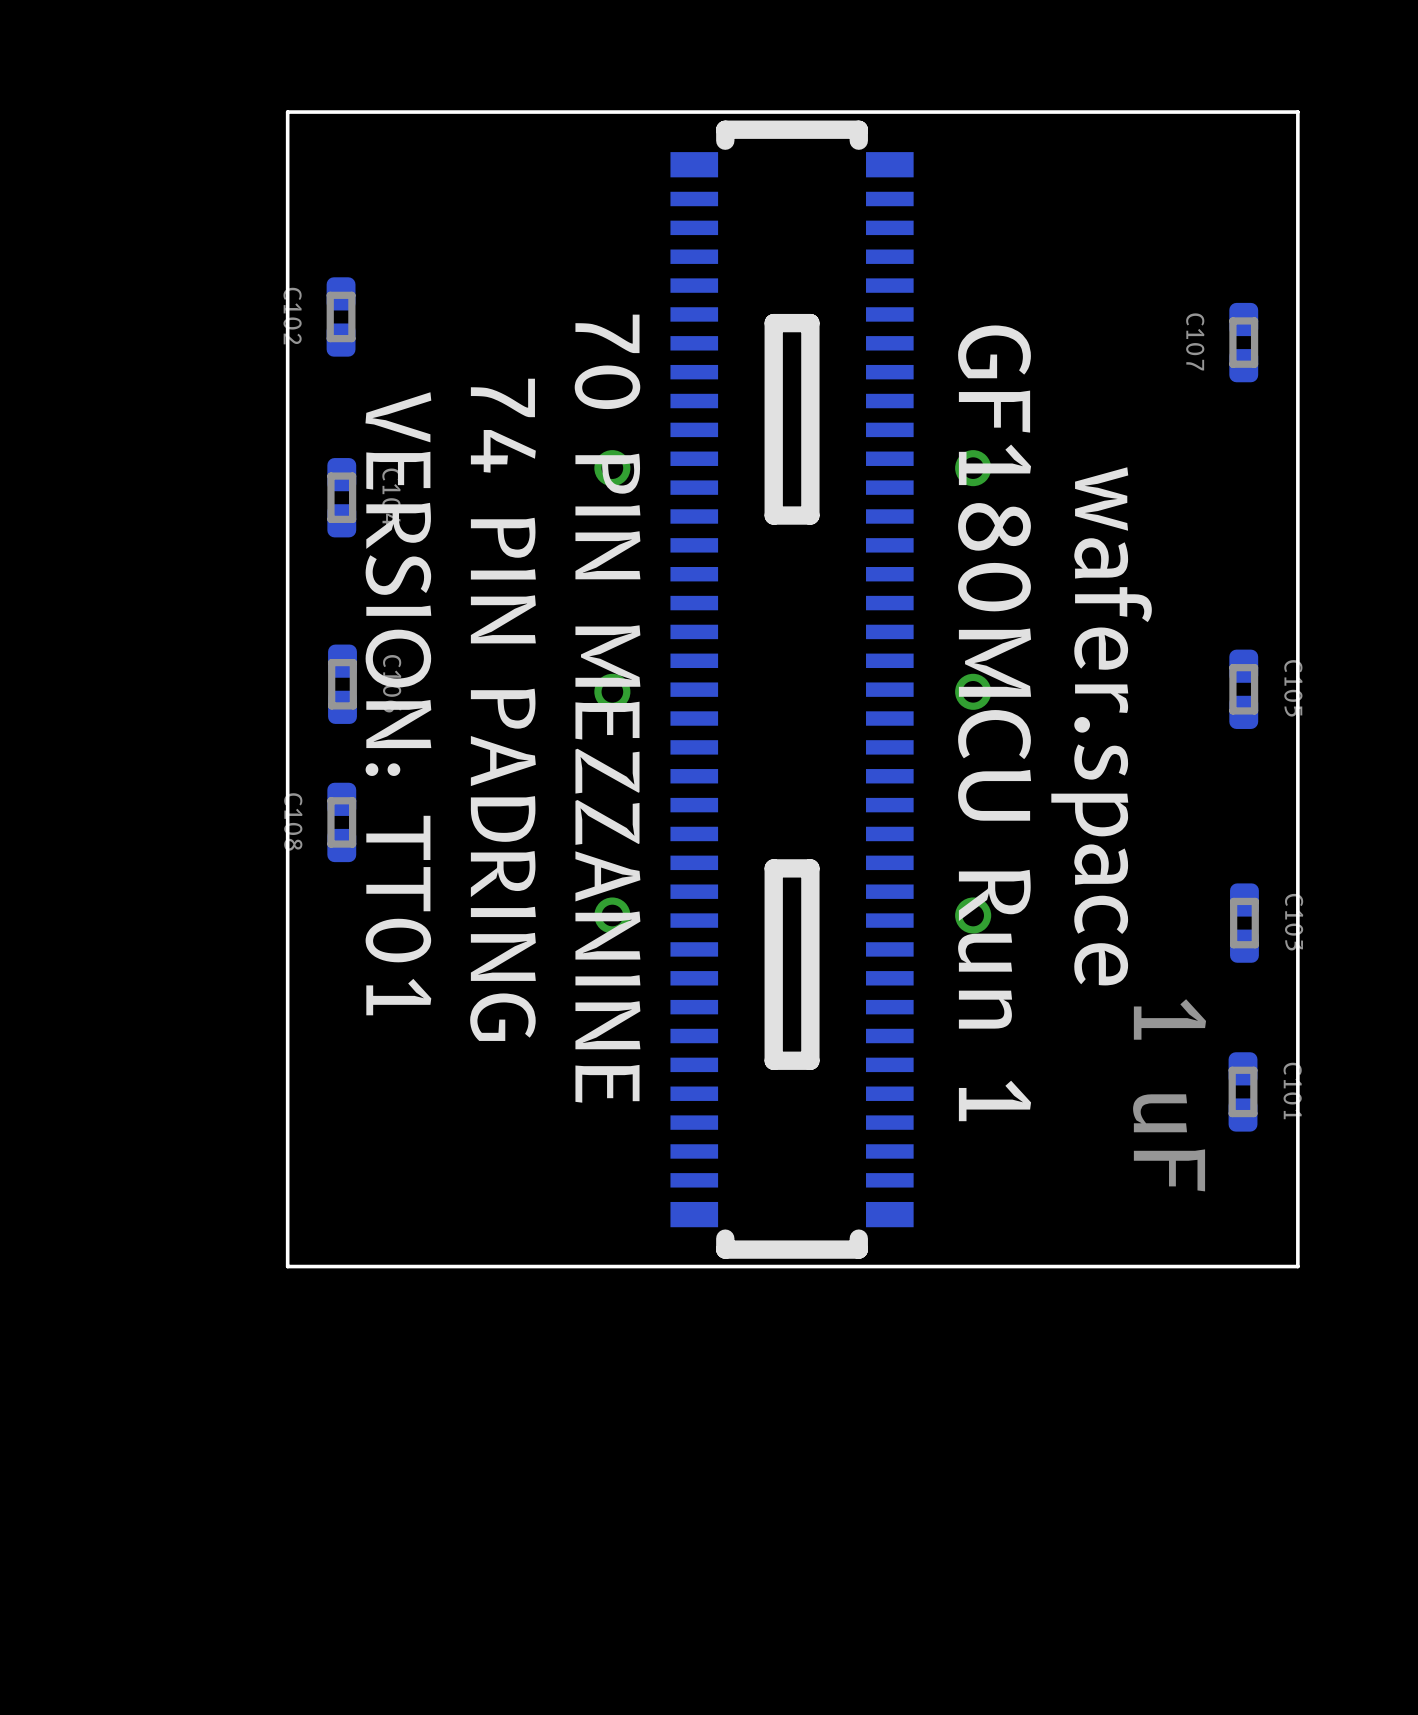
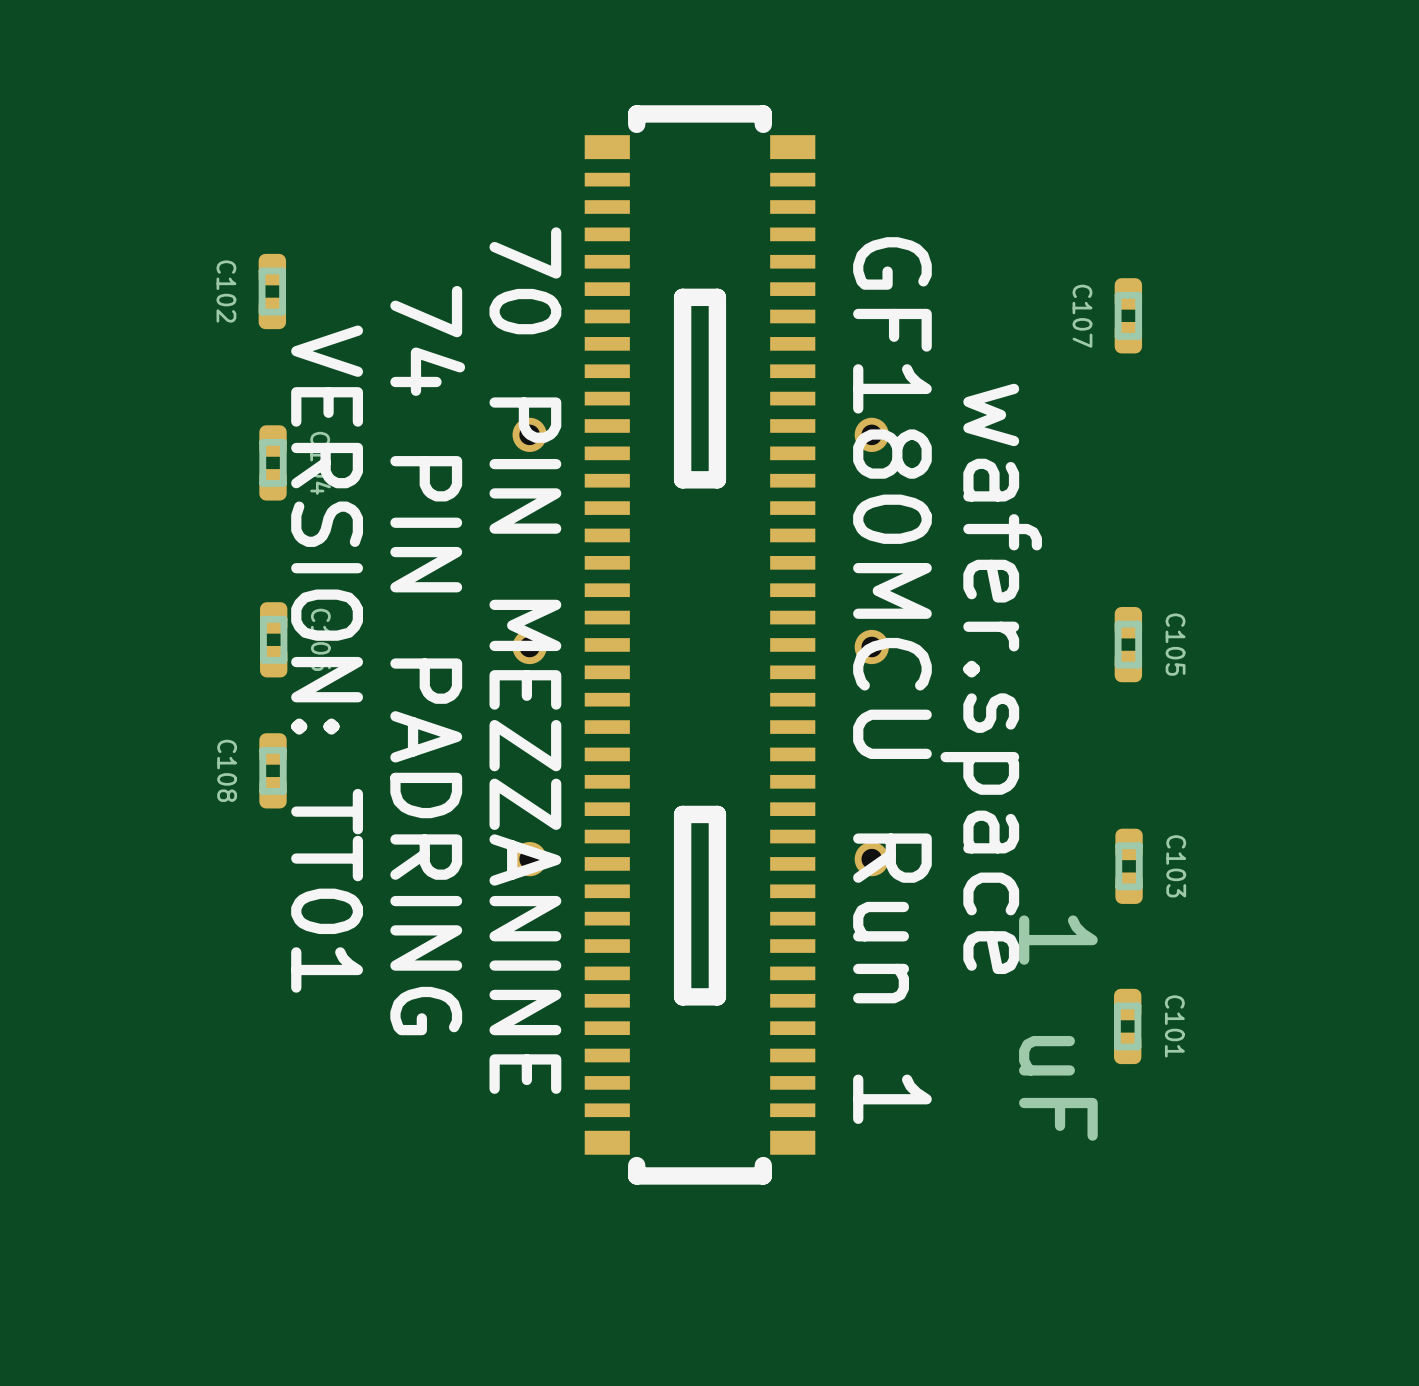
board edge: (1297, 112) (287, 112) (287, 1266) (1297, 1266) (1297, 112) -> none

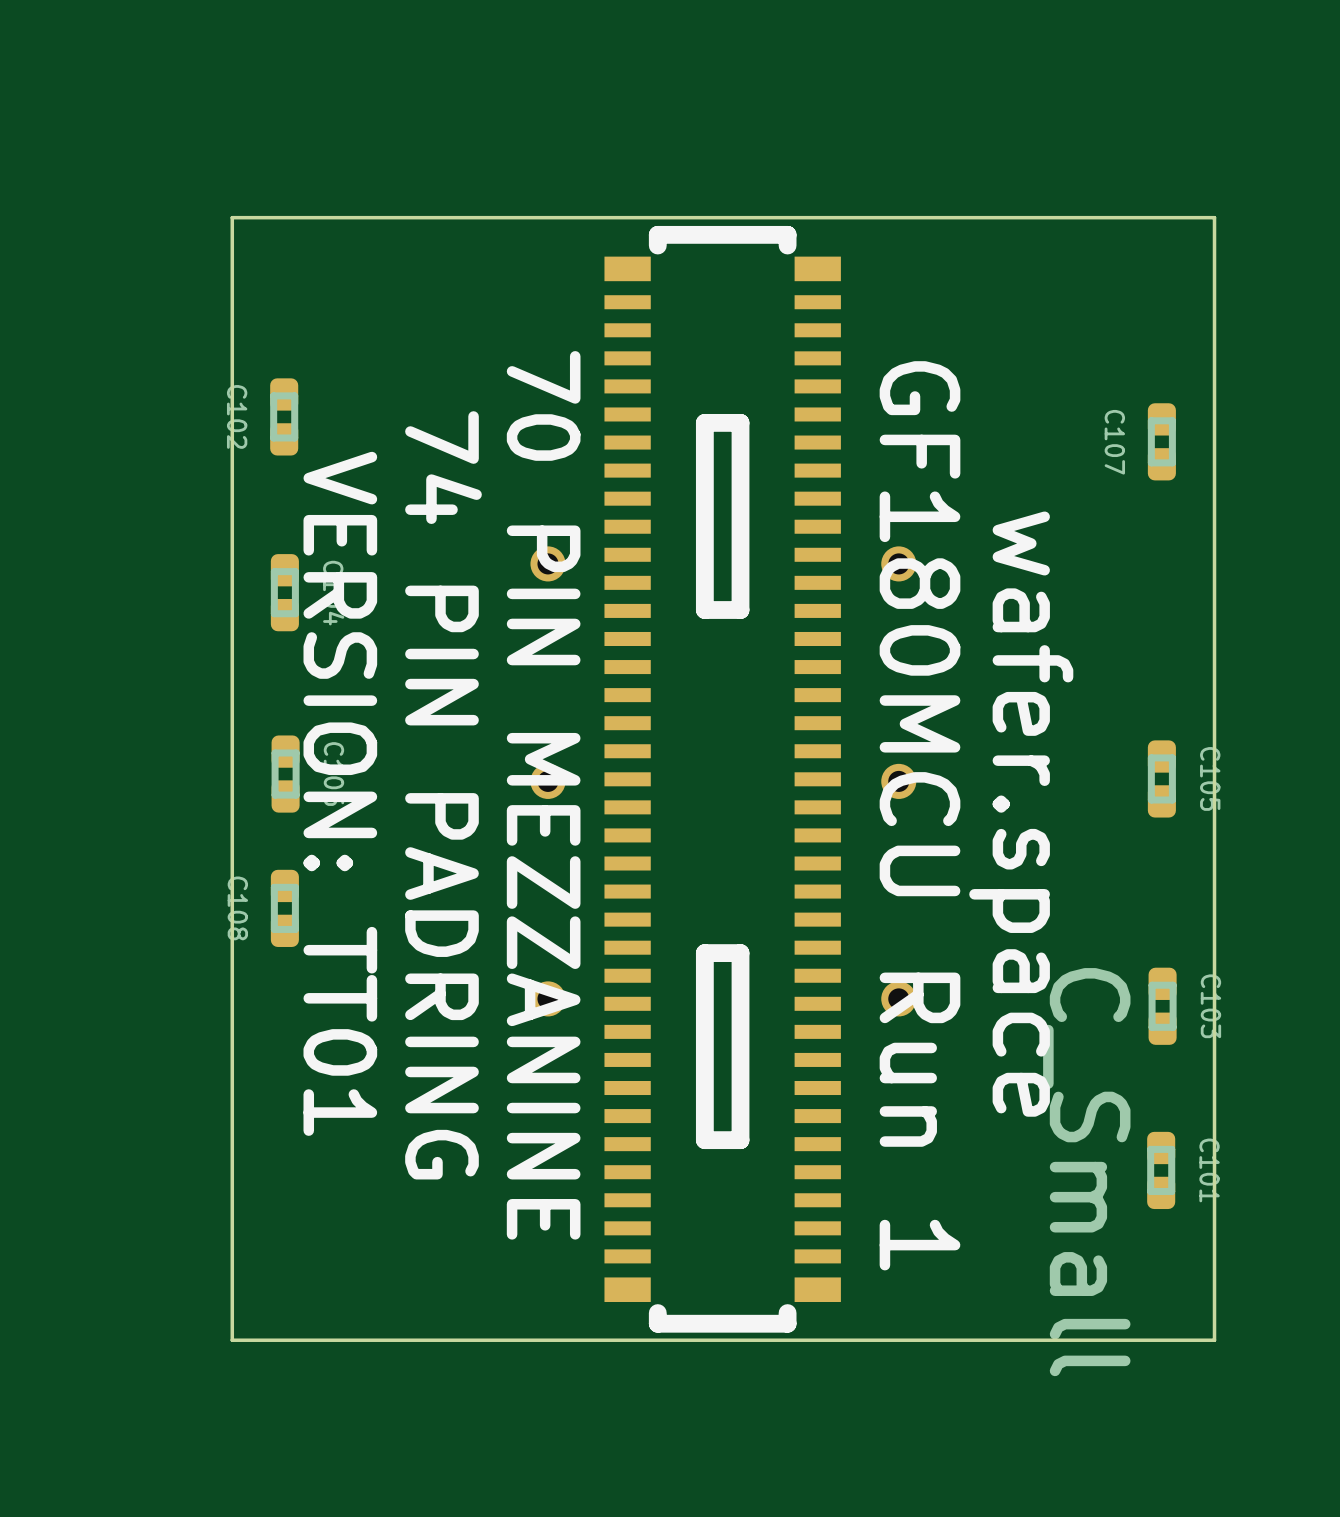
board edge: none -> (1214, 217) (232, 217) (232, 1340) (1214, 1340) (1214, 217)
C101 value: 1 uF (1058, 1028) -> C_Small (1086, 1172)

